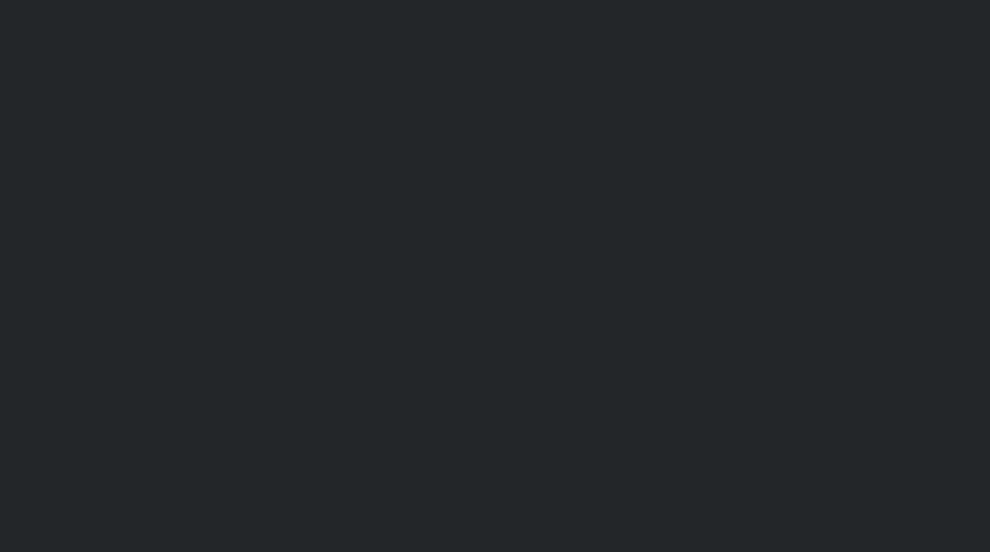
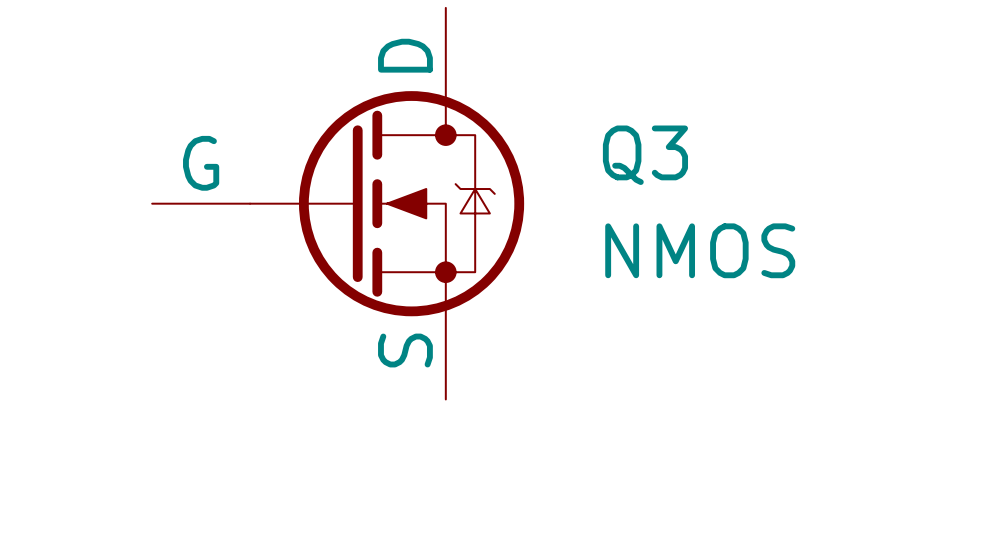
Q3: none -> NMOS (338, 203)

